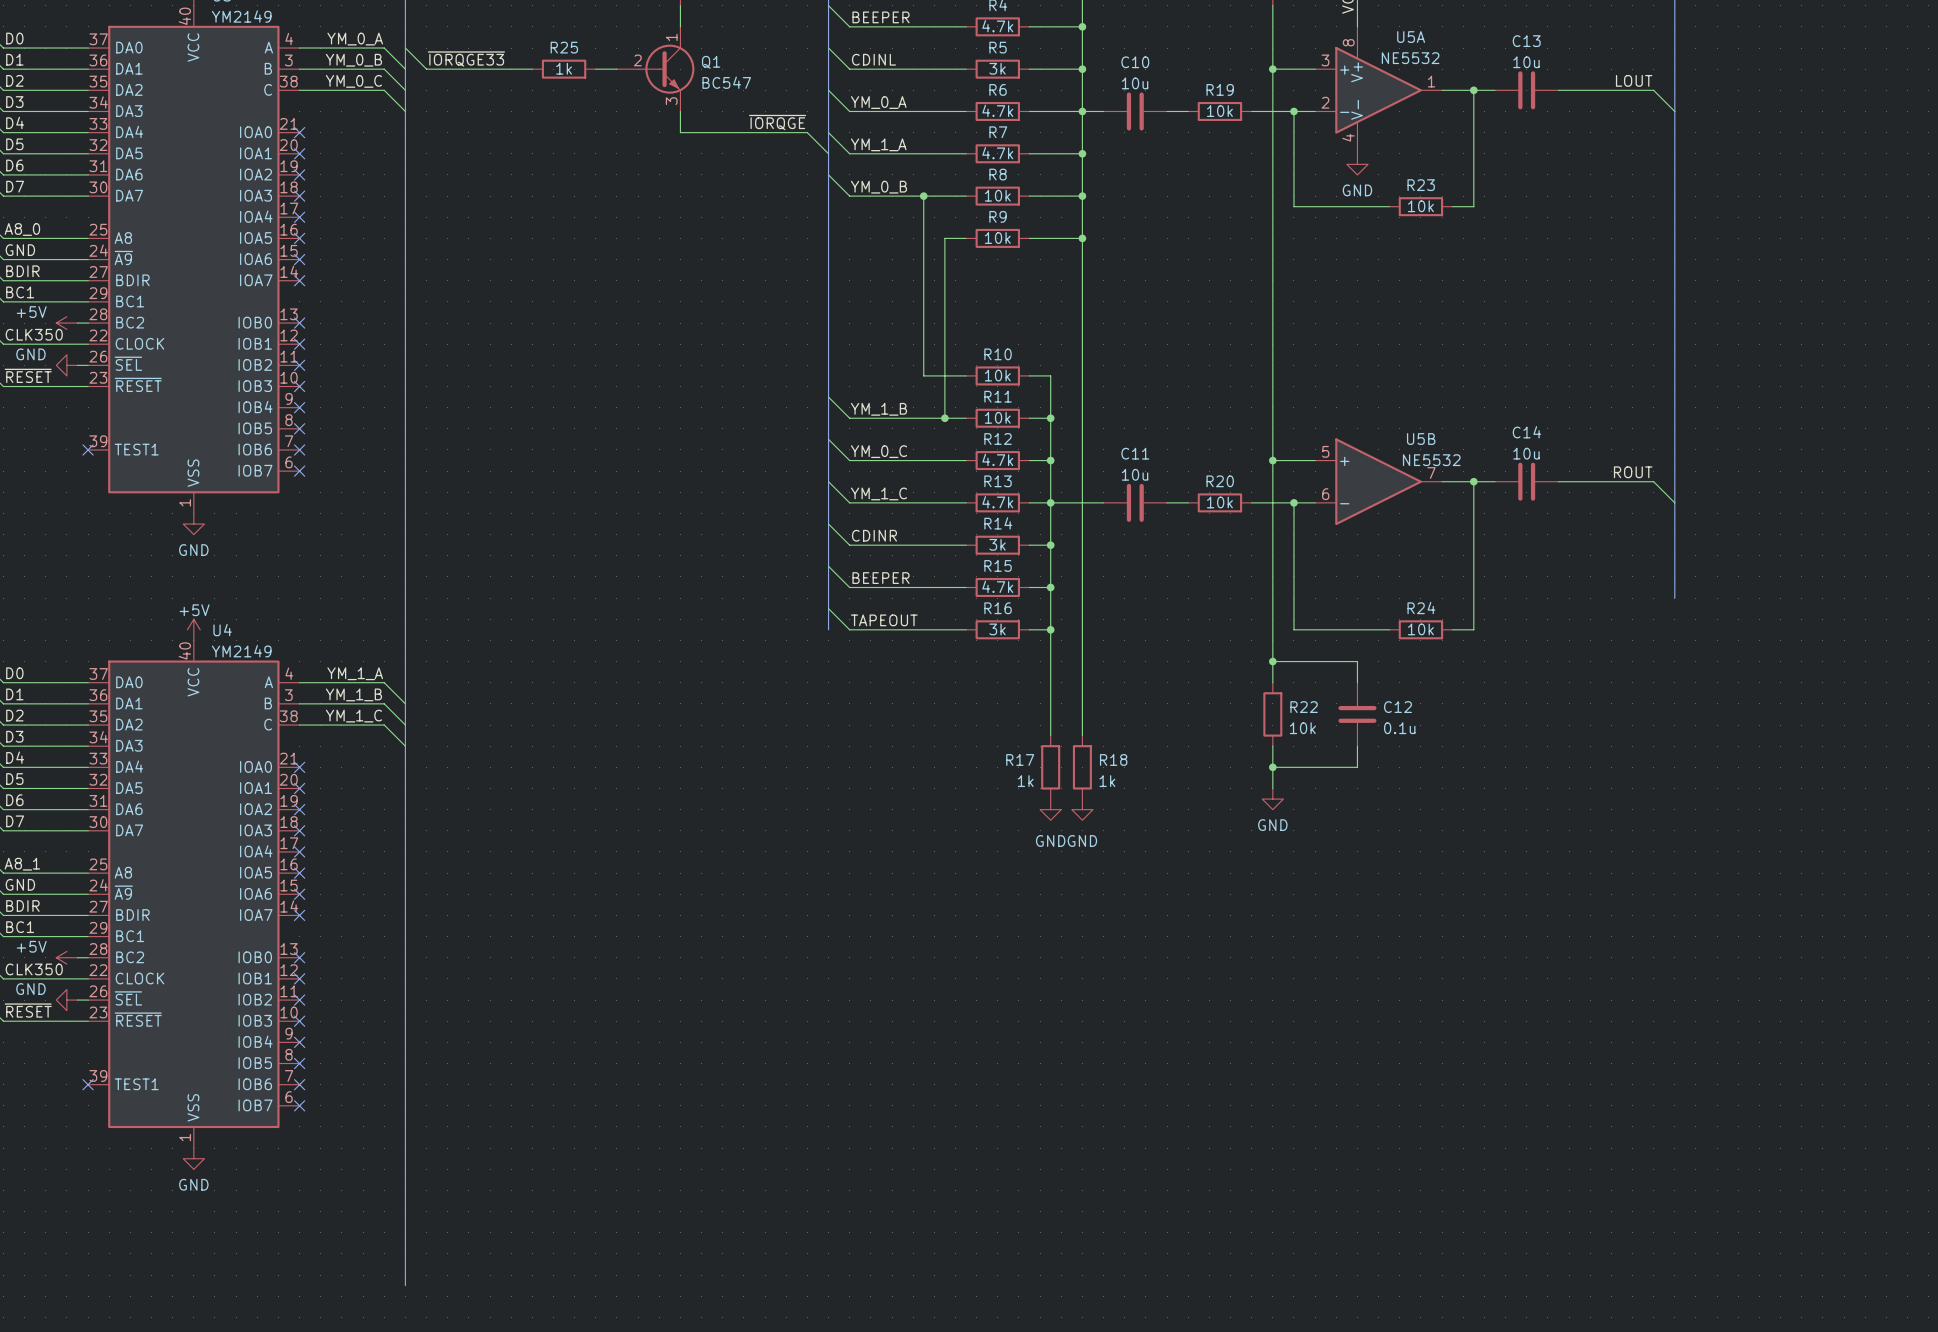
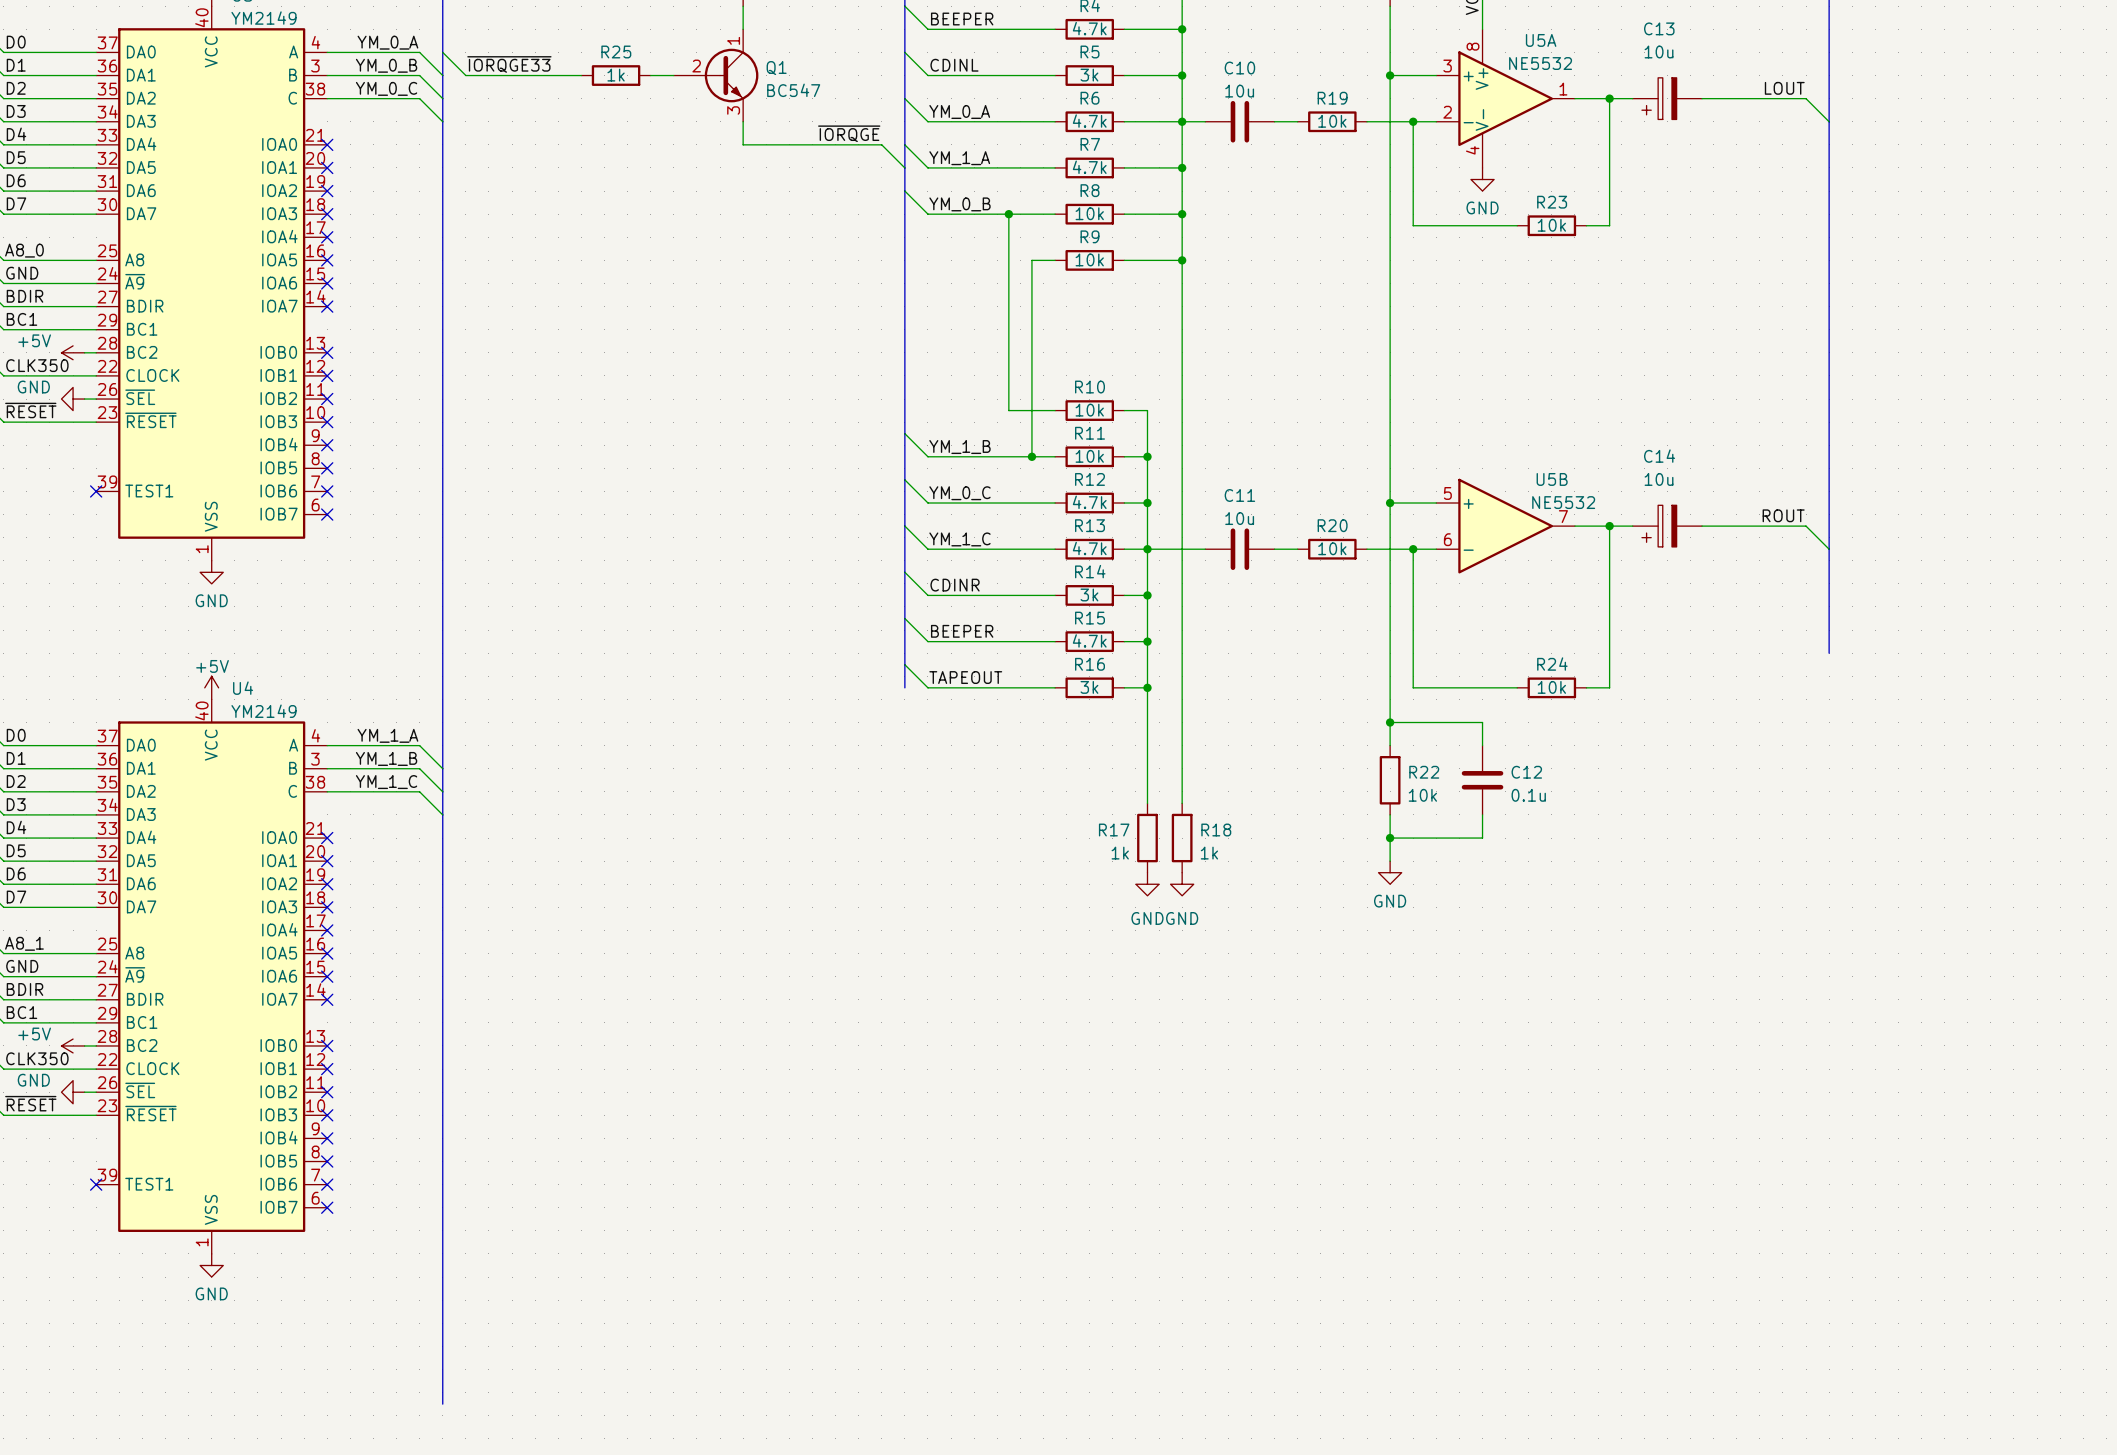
C13 symbol: [1494, 71, 1559, 110] -> [1632, 77, 1703, 120]
C14 symbol: [1494, 462, 1559, 501] -> [1632, 505, 1703, 547]

